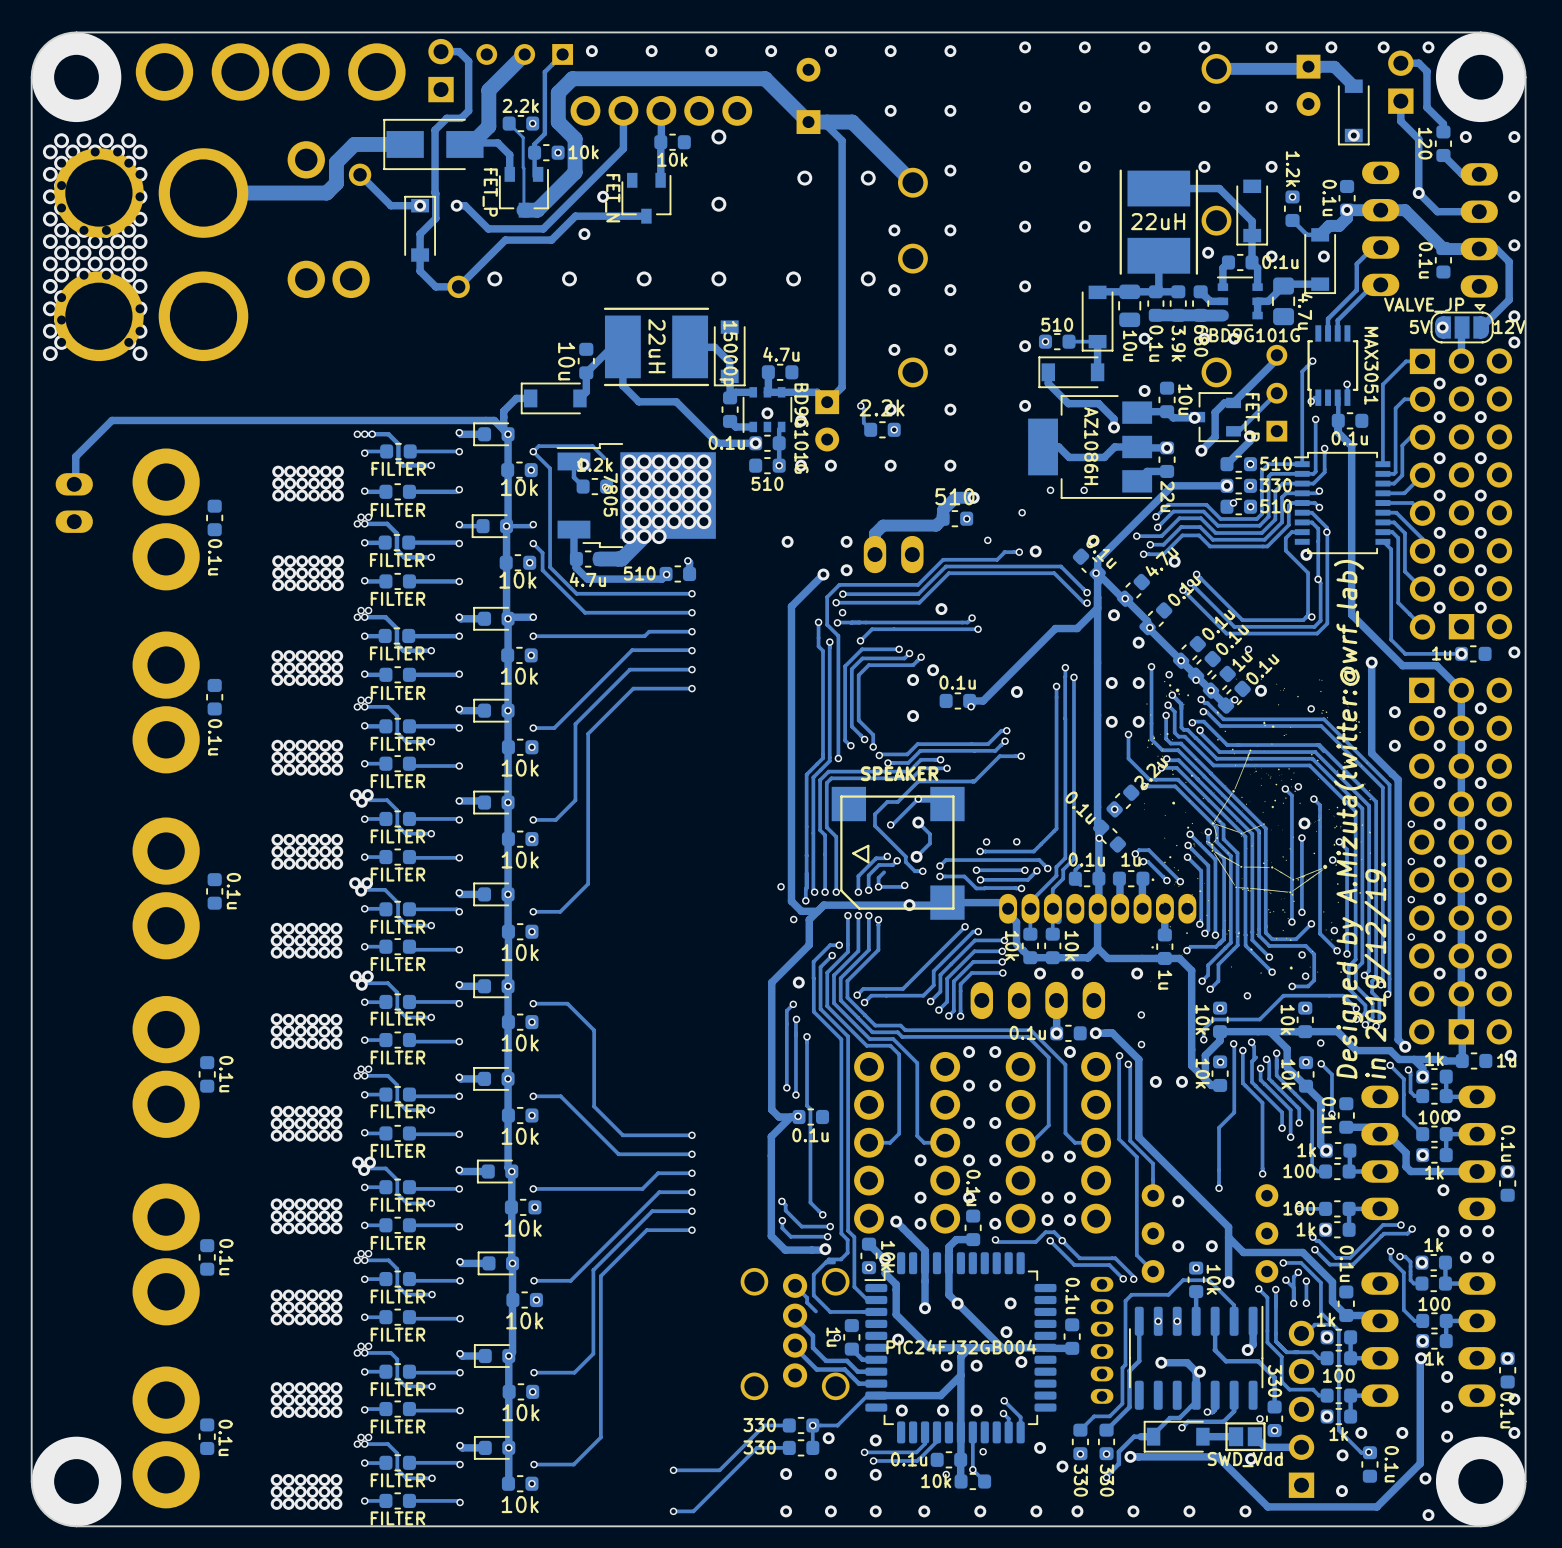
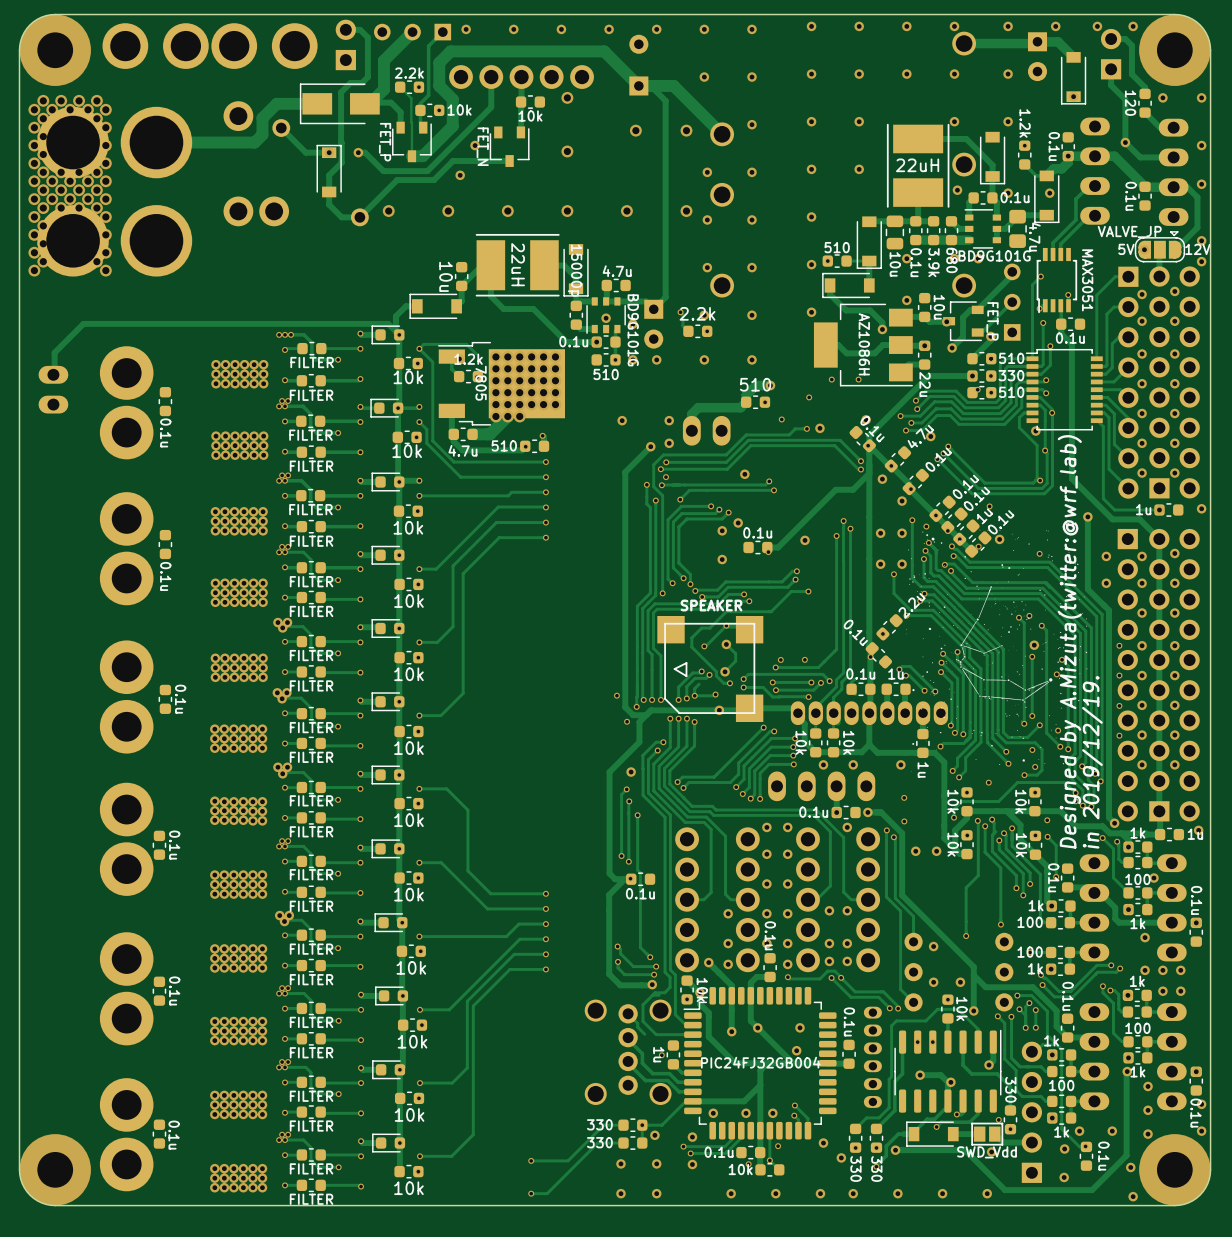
via: (898, 1339) -> none
via: (1021, 1362) -> none
via: (946, 1365) -> none
via: (976, 1365) -> none
via: (875, 1511) -> none

